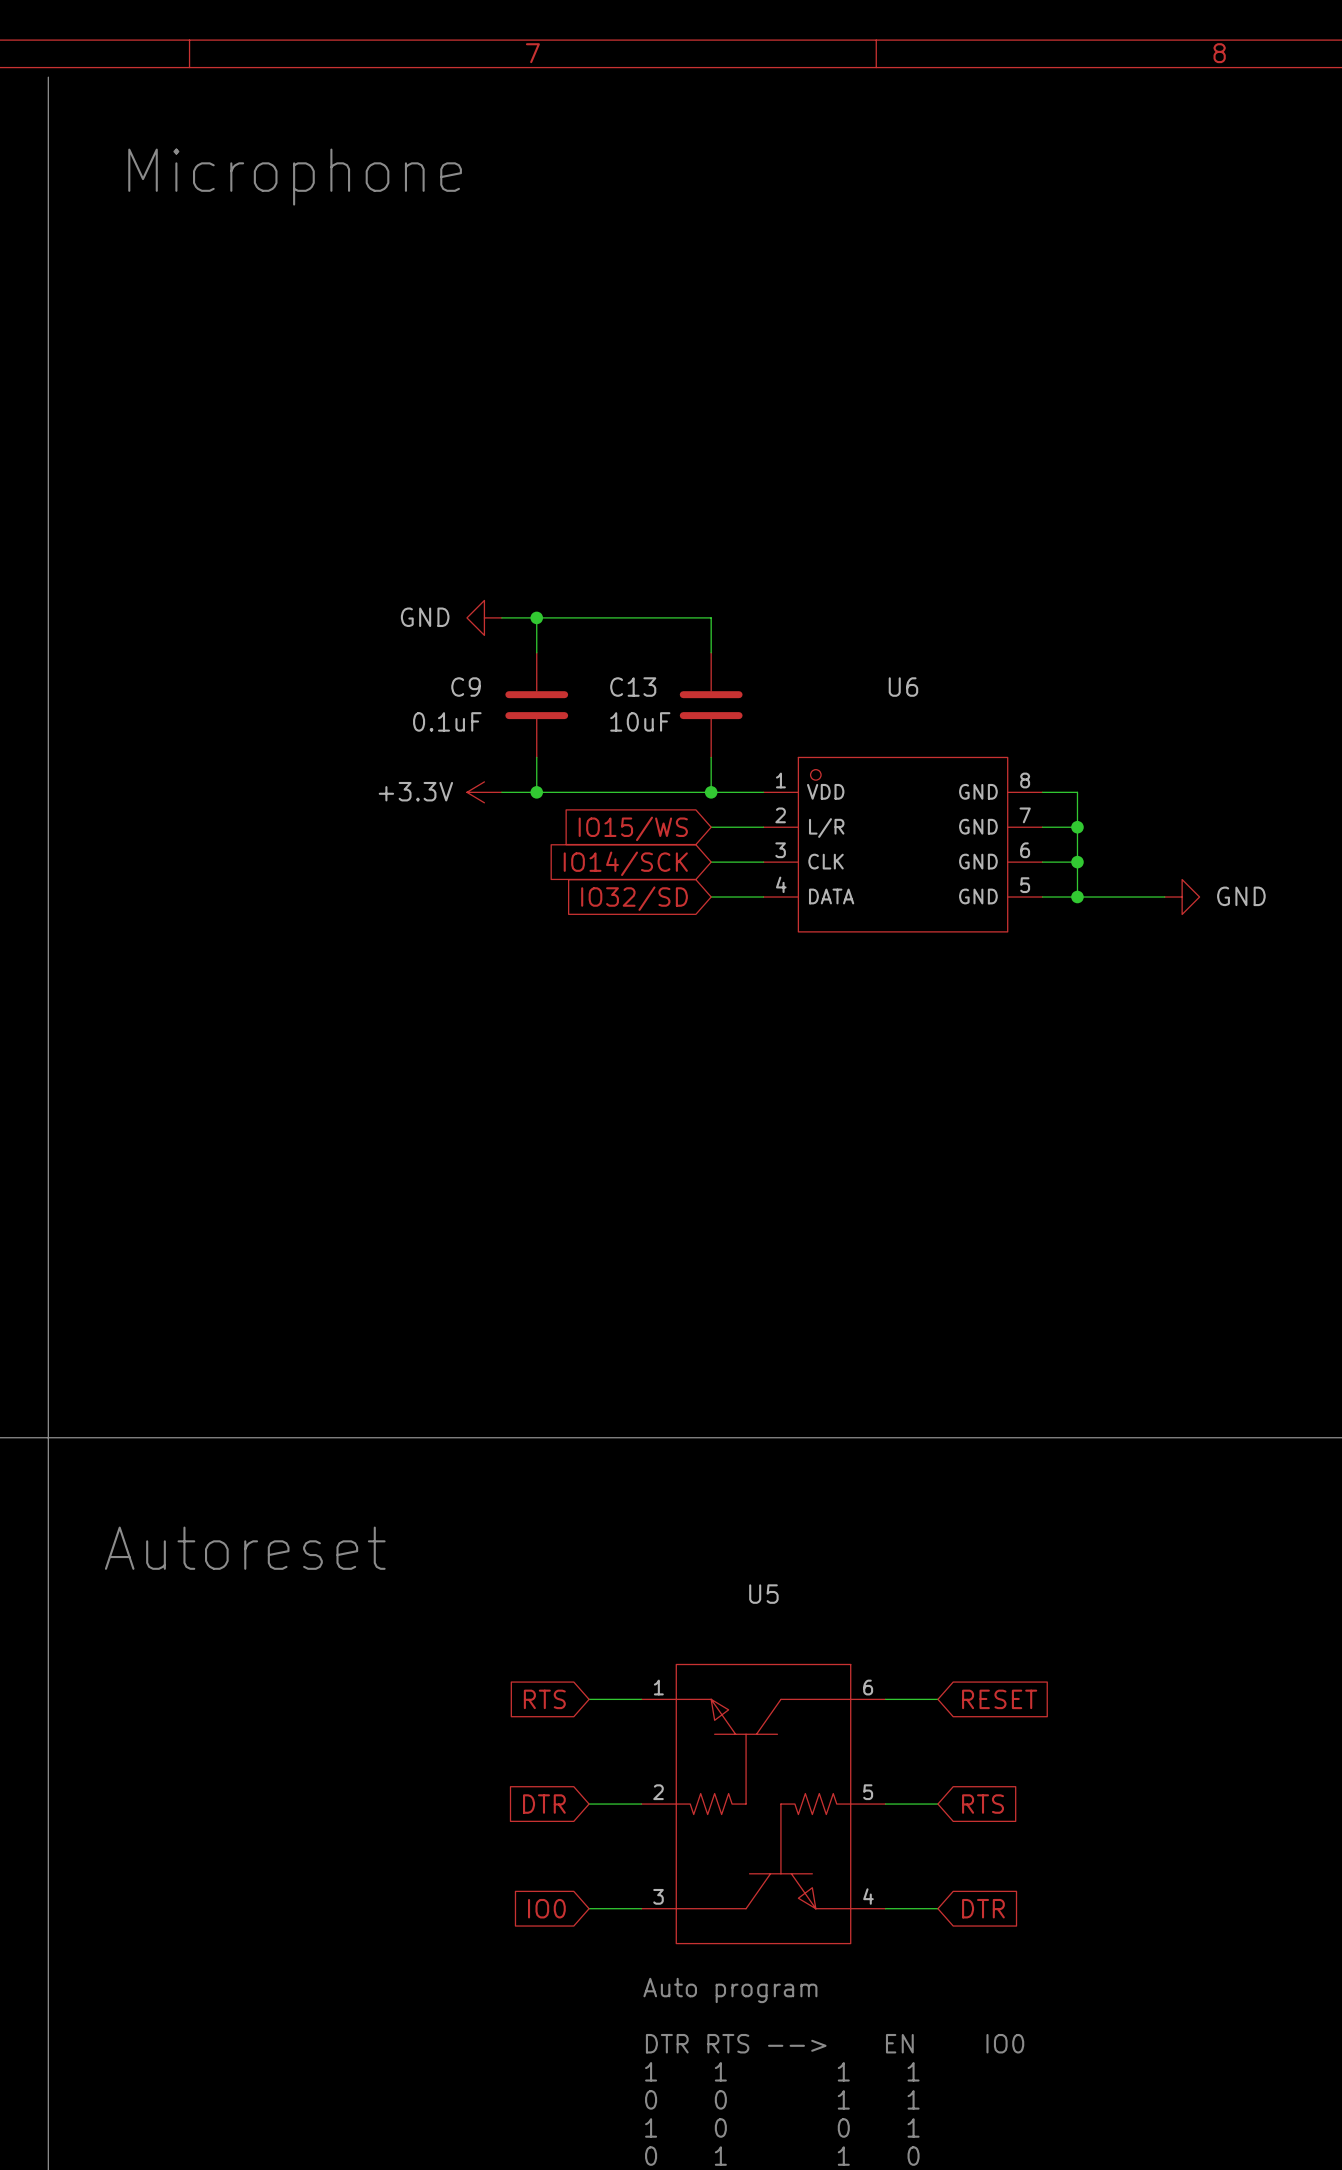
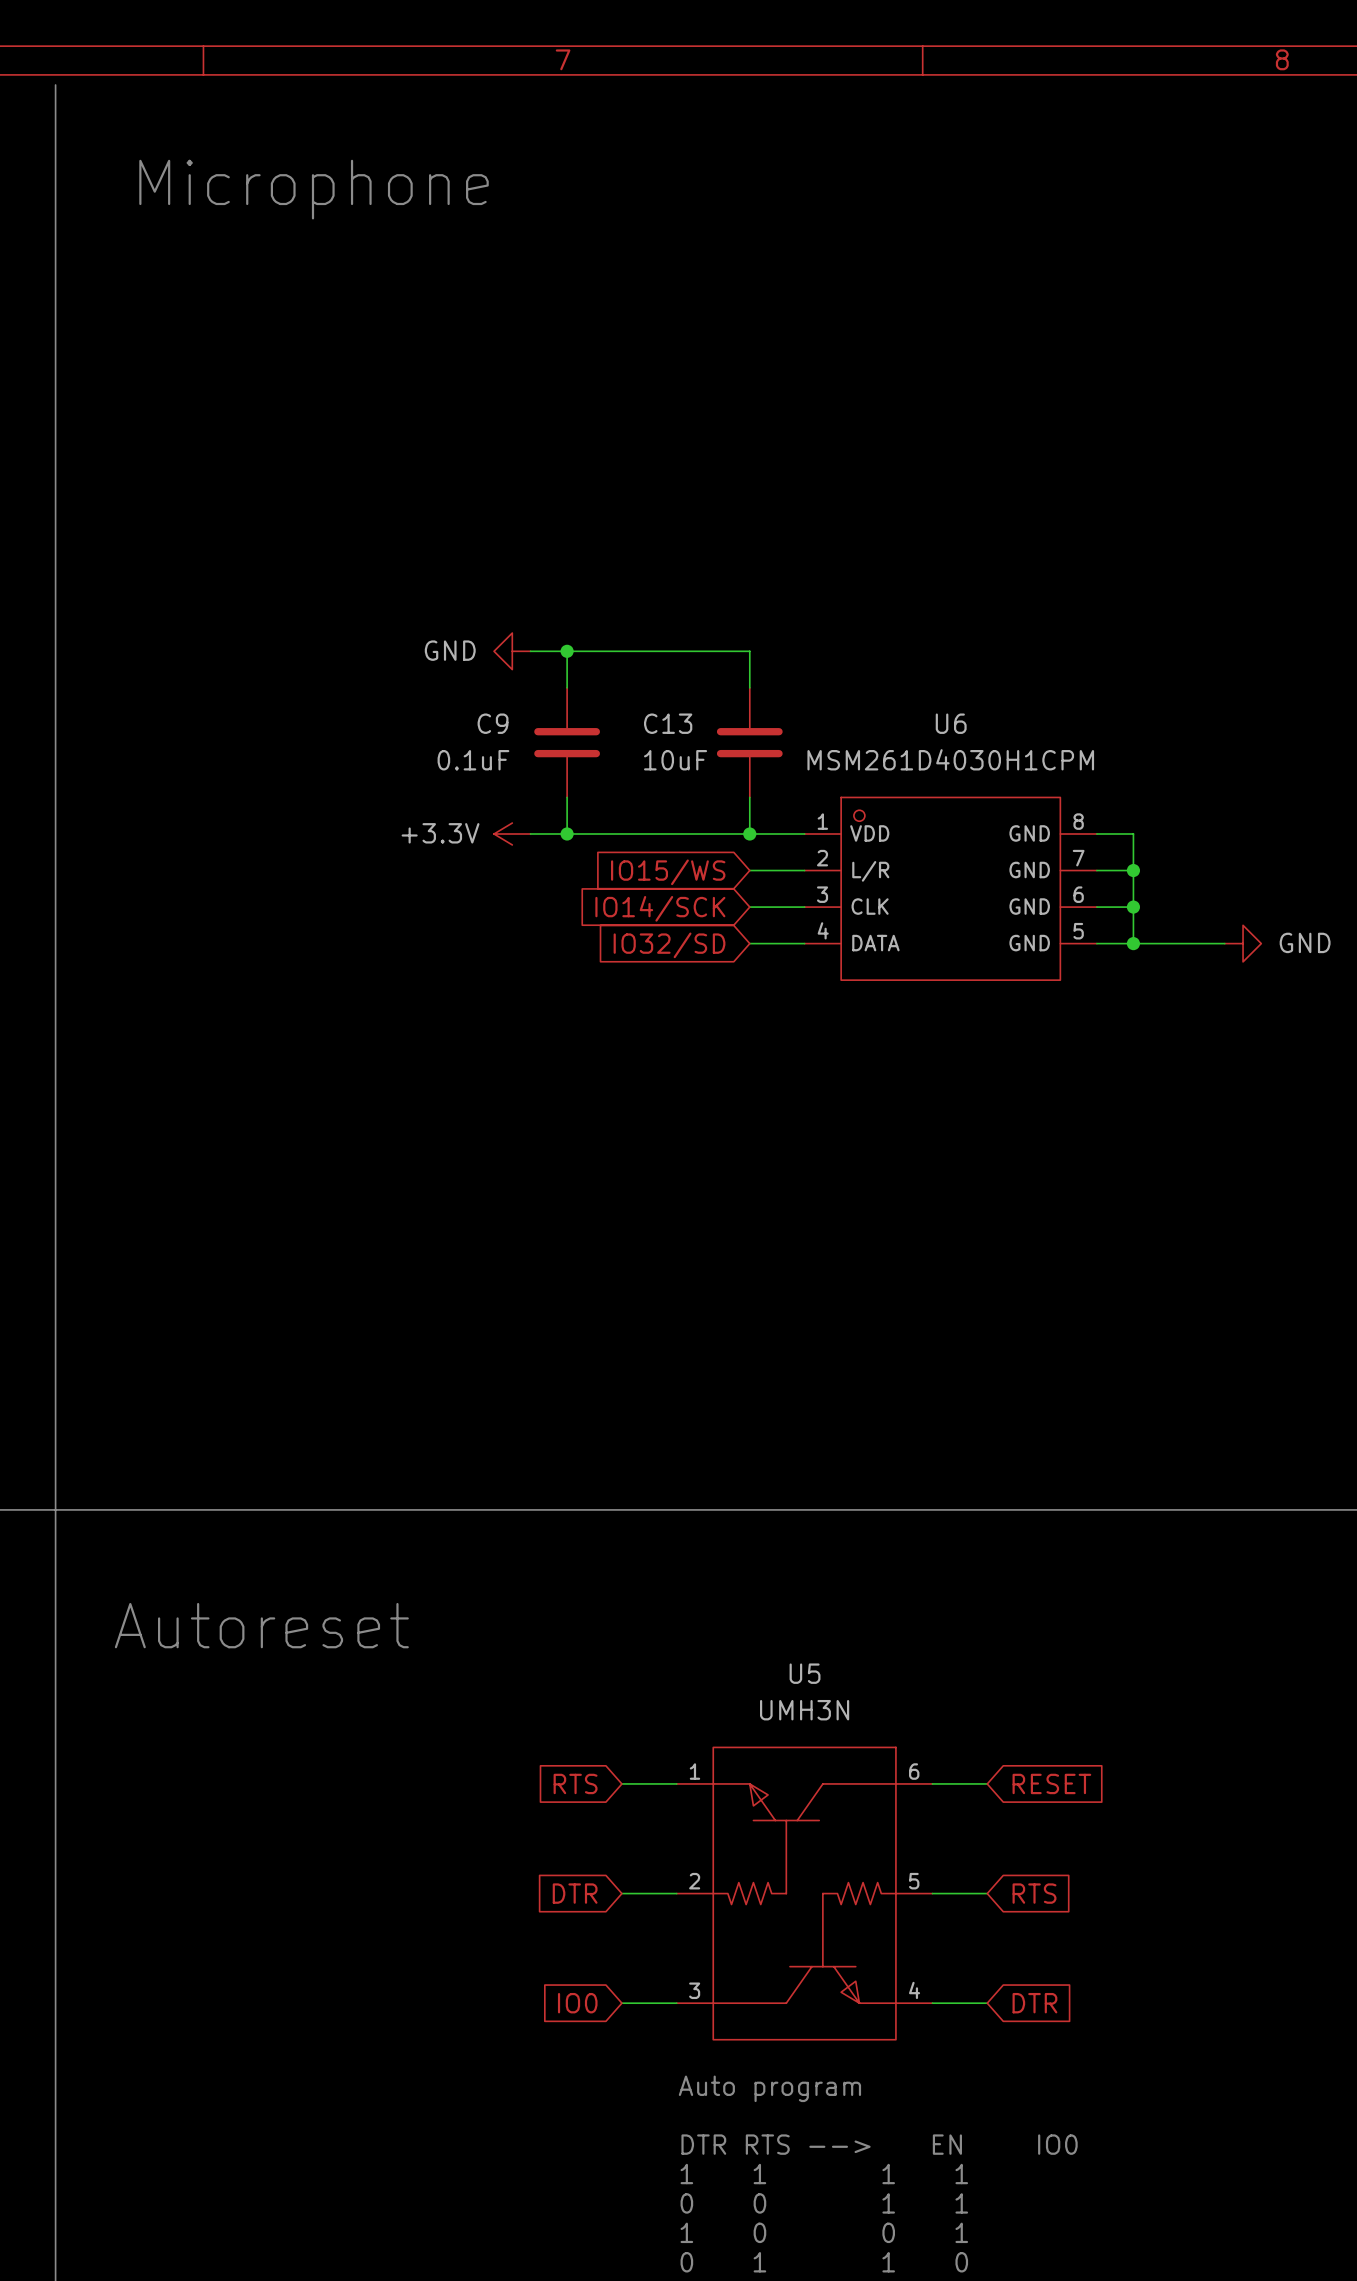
U6 value: none -> MSM261D4030H1CPM (950, 759)
U5 value: none -> UMH3N (804, 1710)

